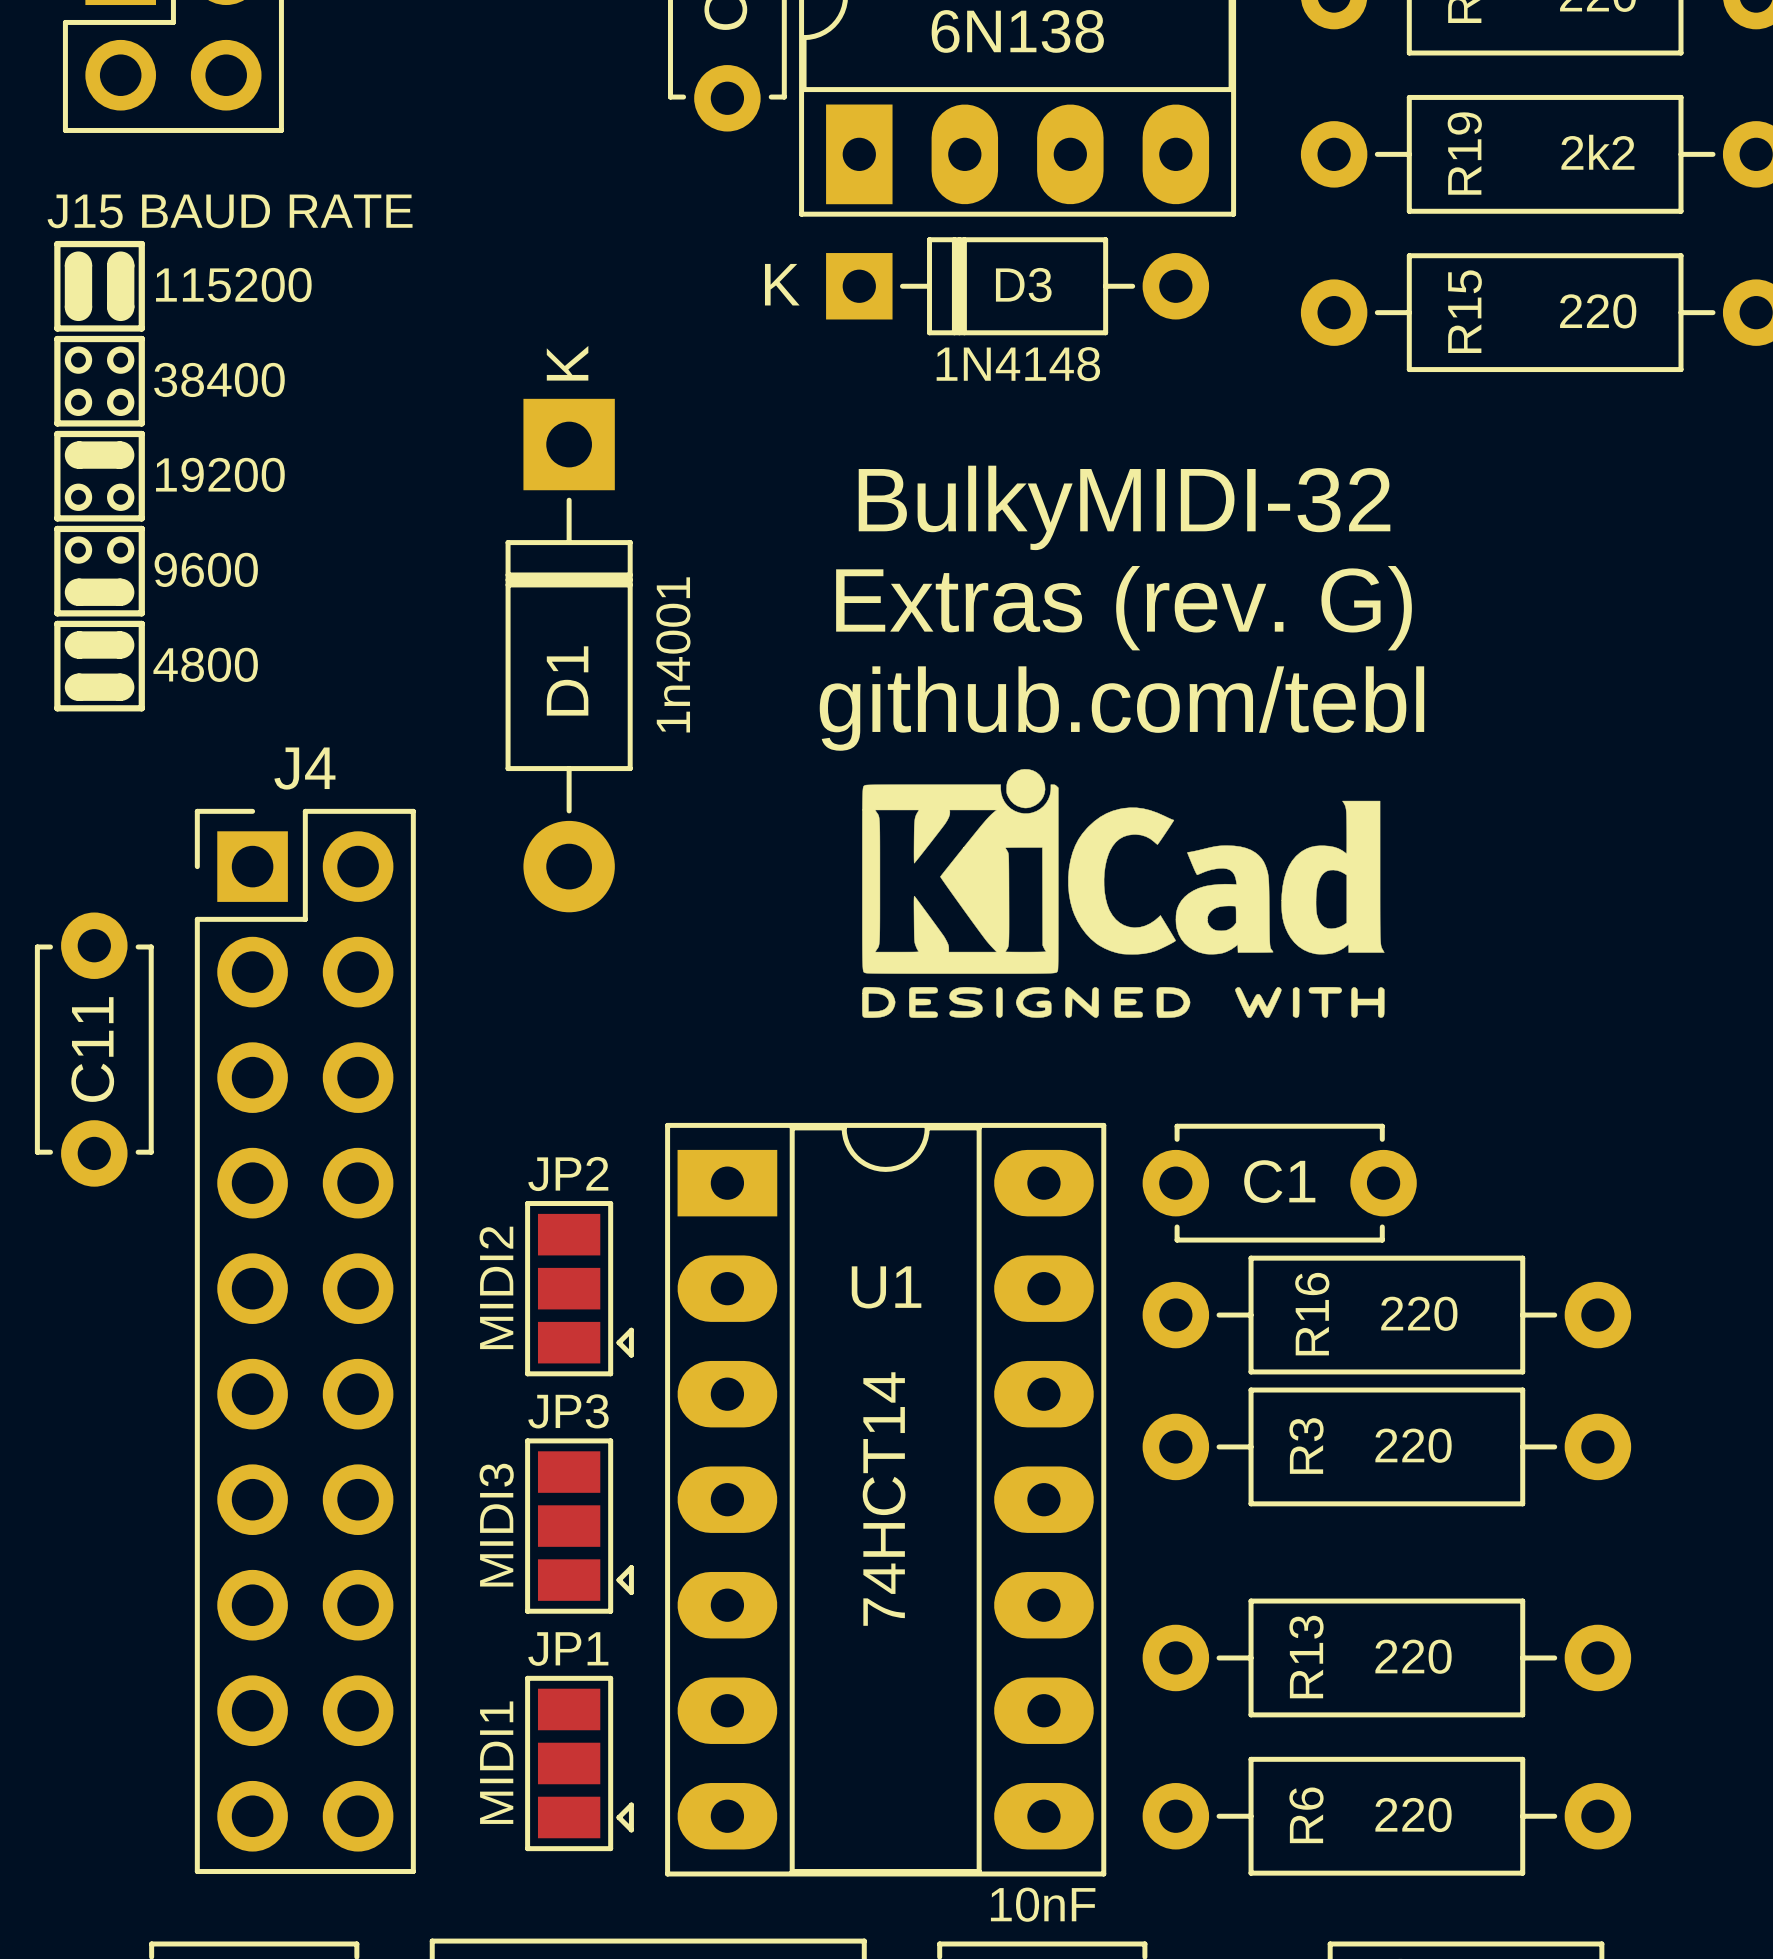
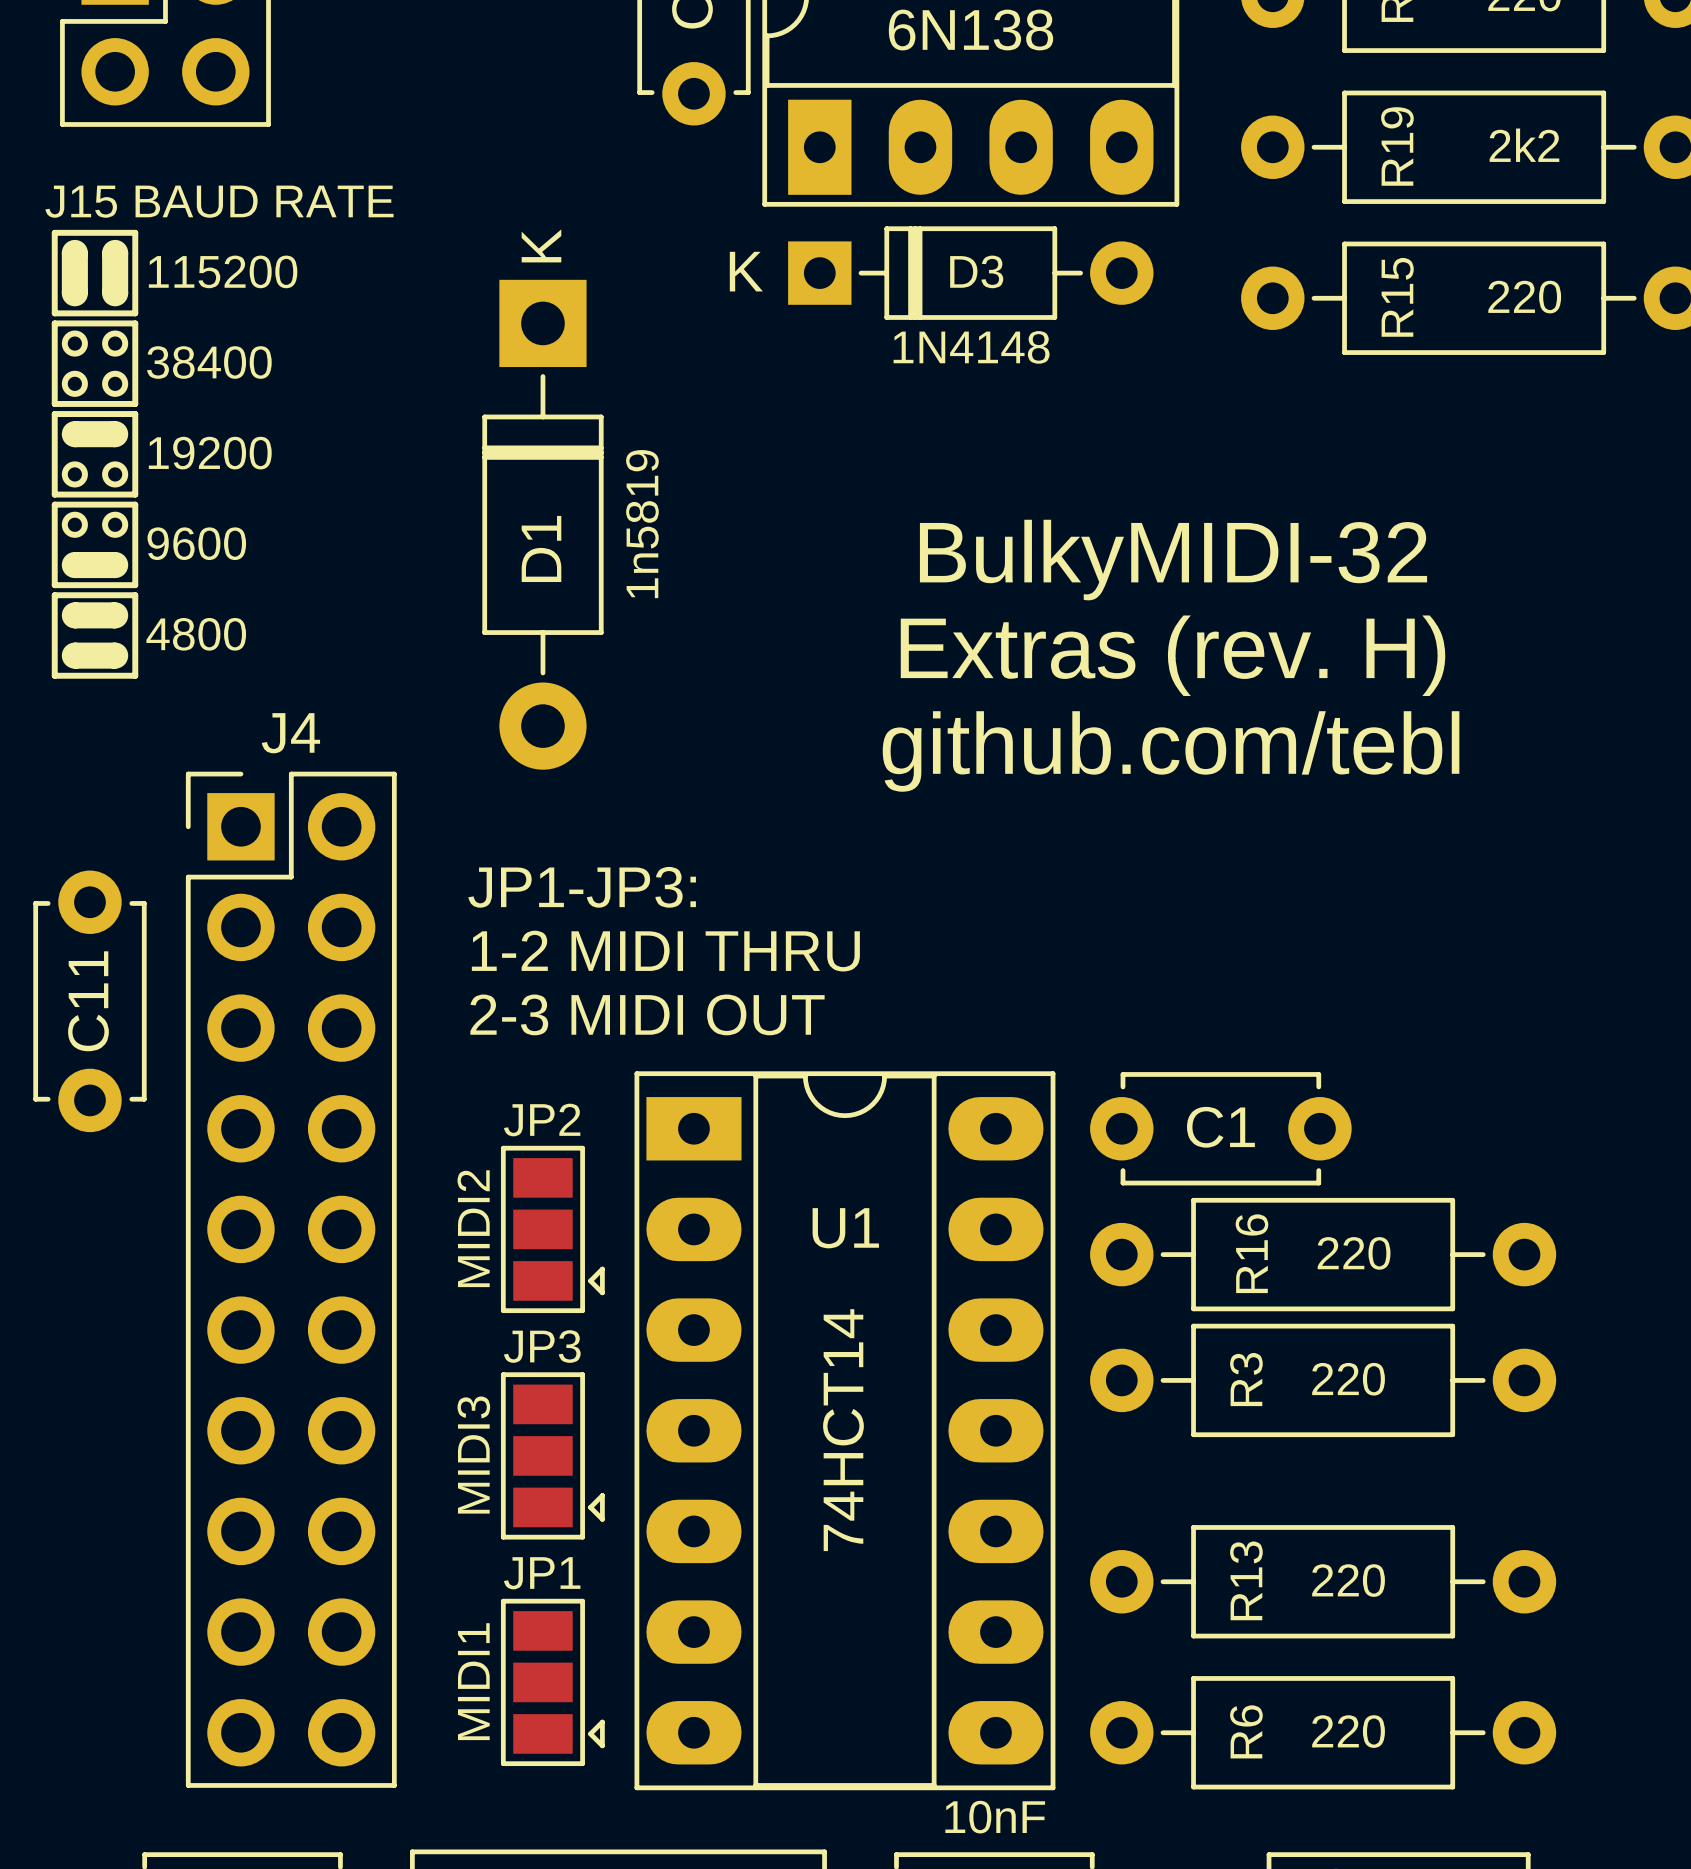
text position: BulkyMIDI-32 (1124, 507) -> BulkyMIDI-32 (1173, 560)
text: Extras (rev. G) (1123, 608) -> Extras (rev. H) (1172, 655)
D1 value: 1n4001 (673, 654) -> 1n5819 (642, 524)
D1 position: (569, 655) -> (542, 524)
text position: github.com/tebl (1121, 708) -> github.com/tebl (1171, 751)
drawing: [862, 769, 1385, 1018] -> none
text: none -> JP1-JP3: (582, 887)
text: none -> 1-2 MIDI THRU (665, 951)
text: none -> 2-3 MIDI OUT (647, 1014)

